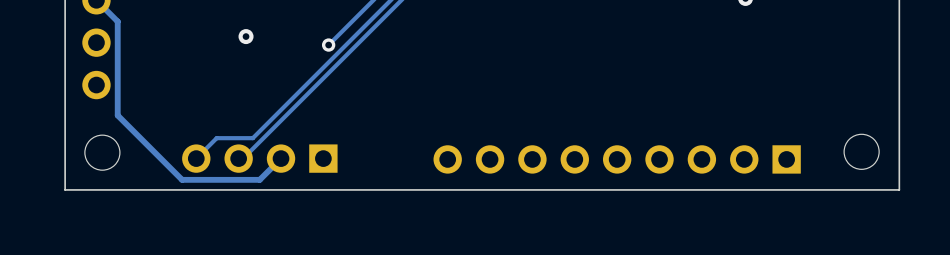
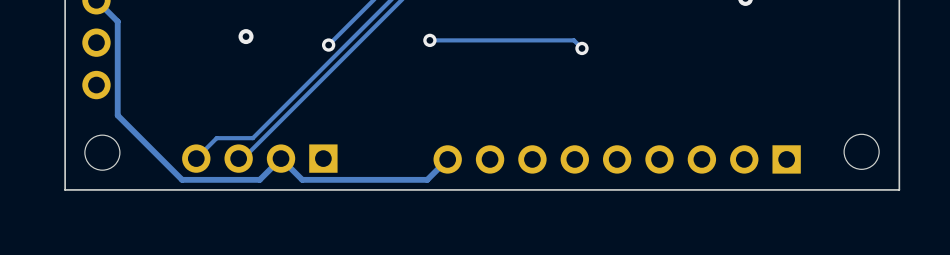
track: none -> (429, 40) (573, 40) (582, 48)
via: none -> (429, 40)
via: none -> (582, 48)
track: none -> (281, 158) (302, 179) (427, 179) (447, 159)

